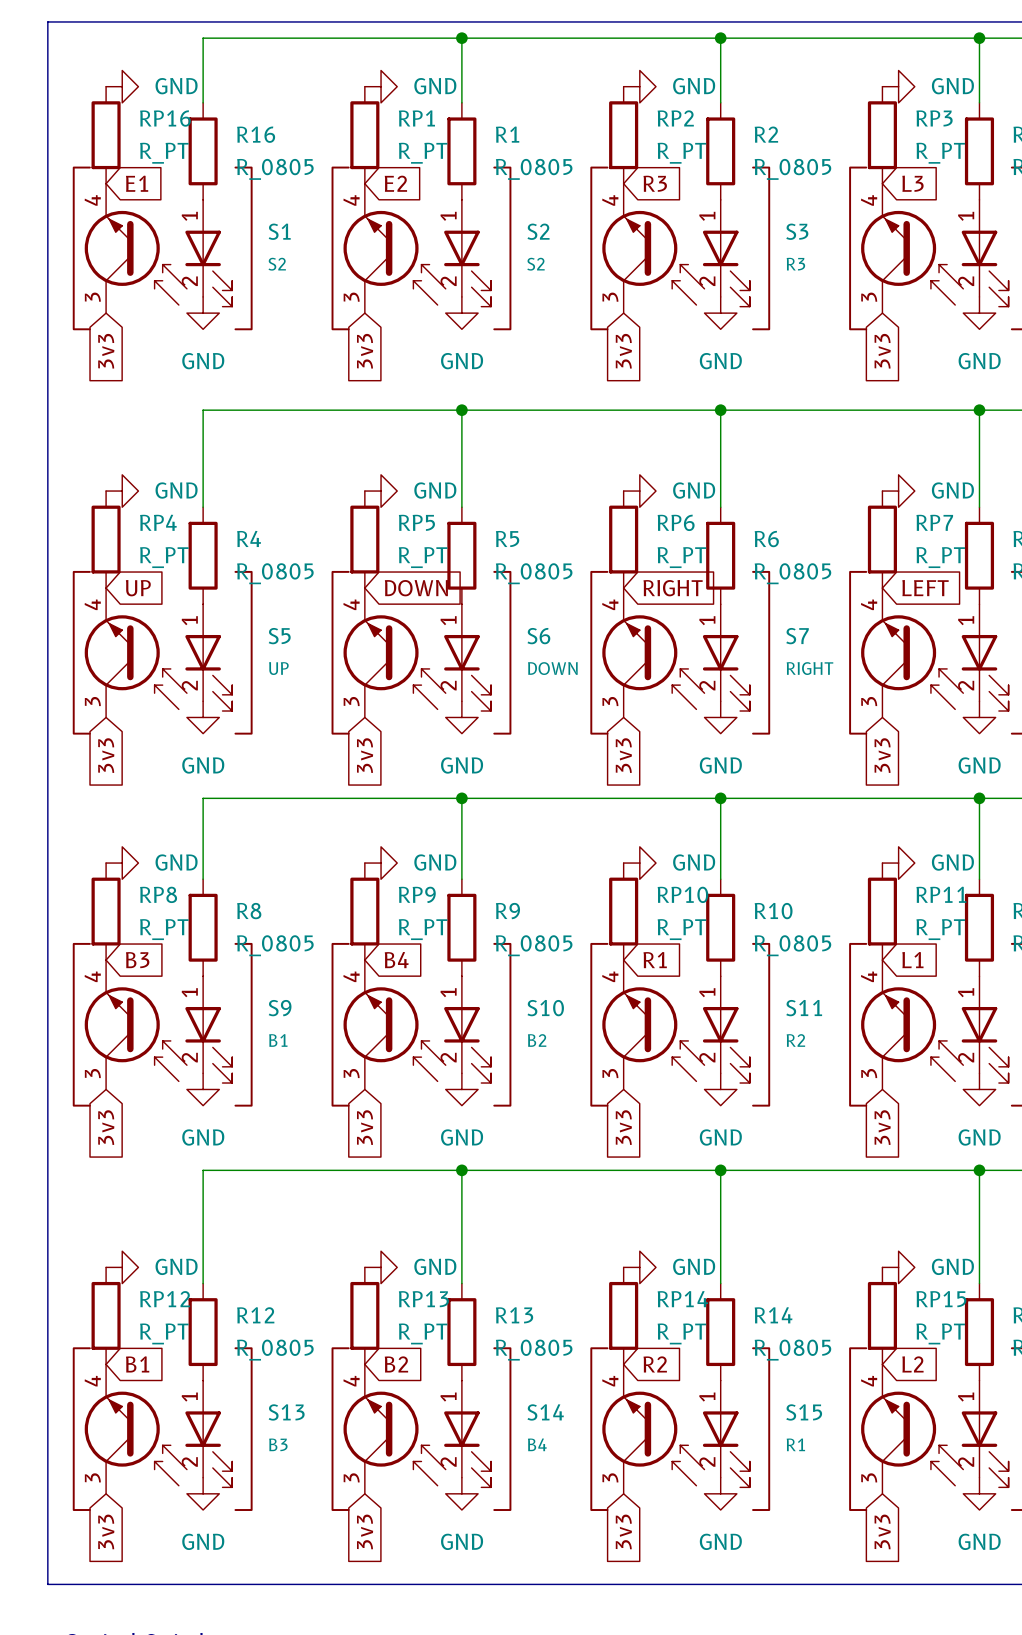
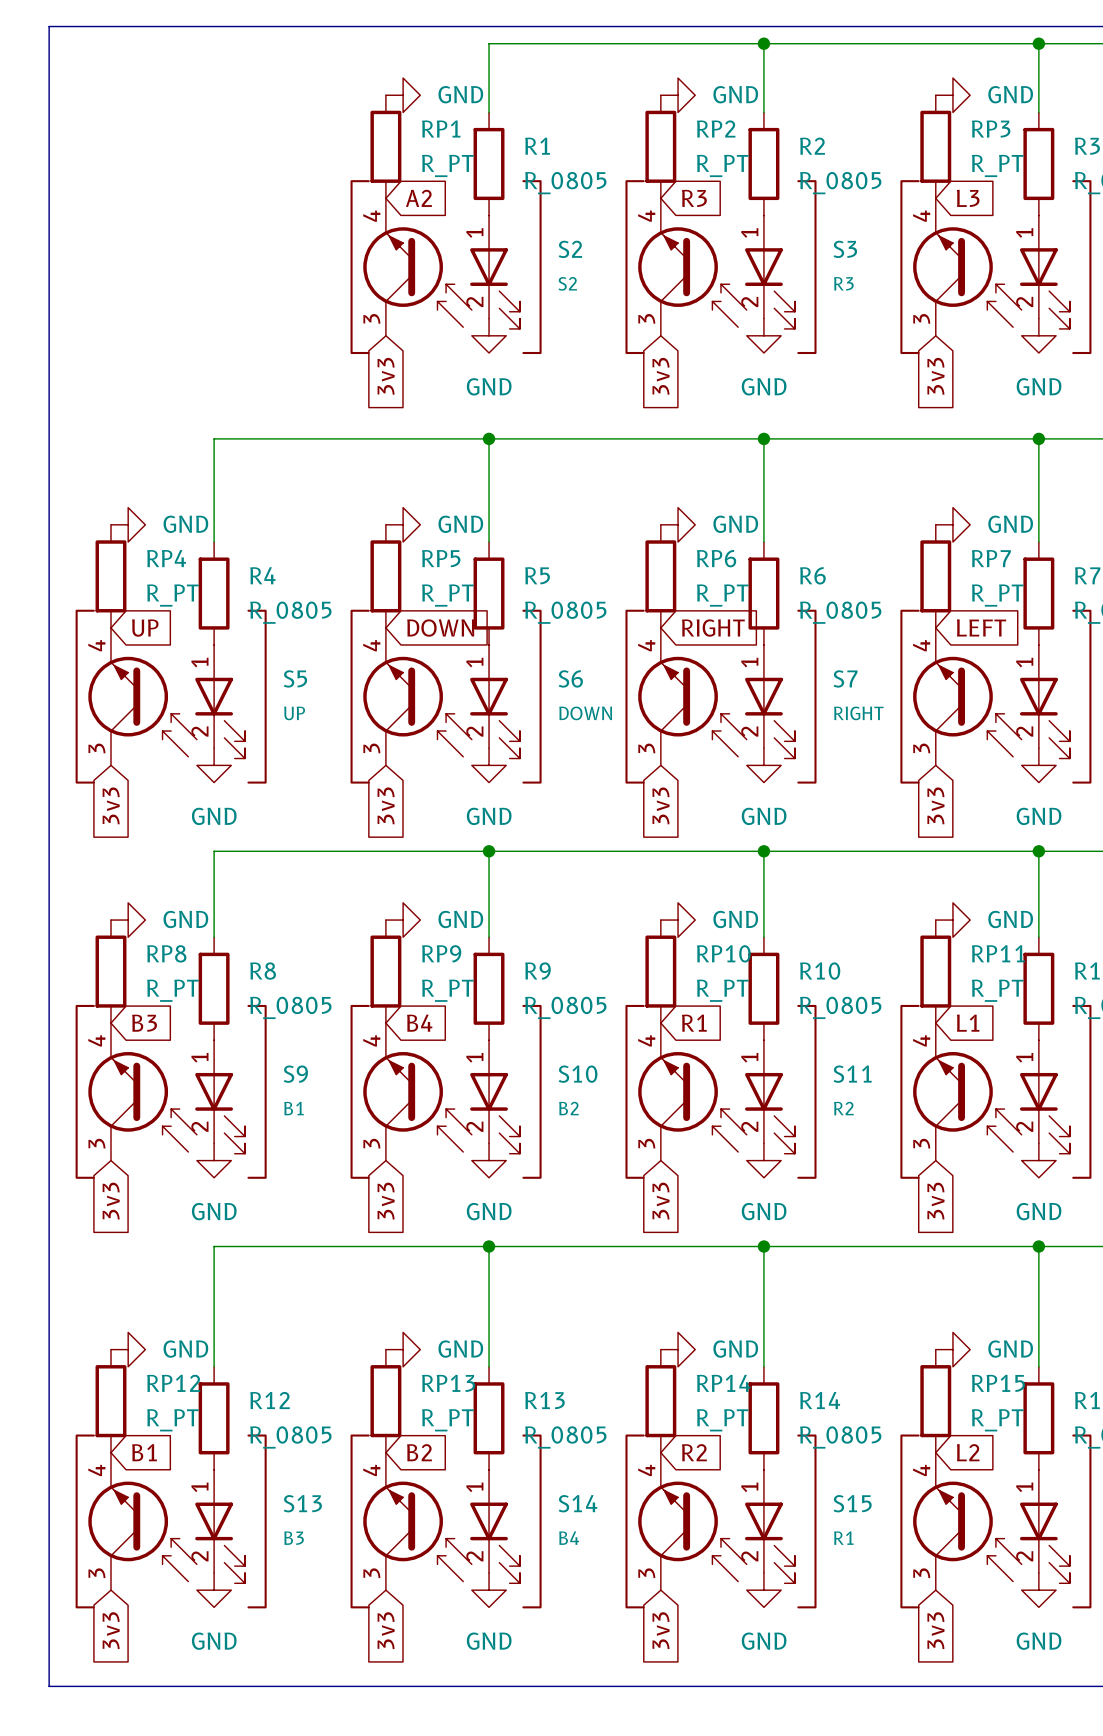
wire: (461, 38) (203, 38) (203, 102) -> none
junction: (461, 38) -> none
power symbol: GND (122, 86) -> none
RP16: R_PT (106, 135) -> none
R16: R_0805 (203, 151) -> none
global label: E1 (137, 183) -> none
global label: E2 (395, 183) -> A2 (418, 198)
S1: S2 (162, 248) -> none
power symbol: GND (203, 313) -> none
global label: 3v3 (106, 351) -> none

